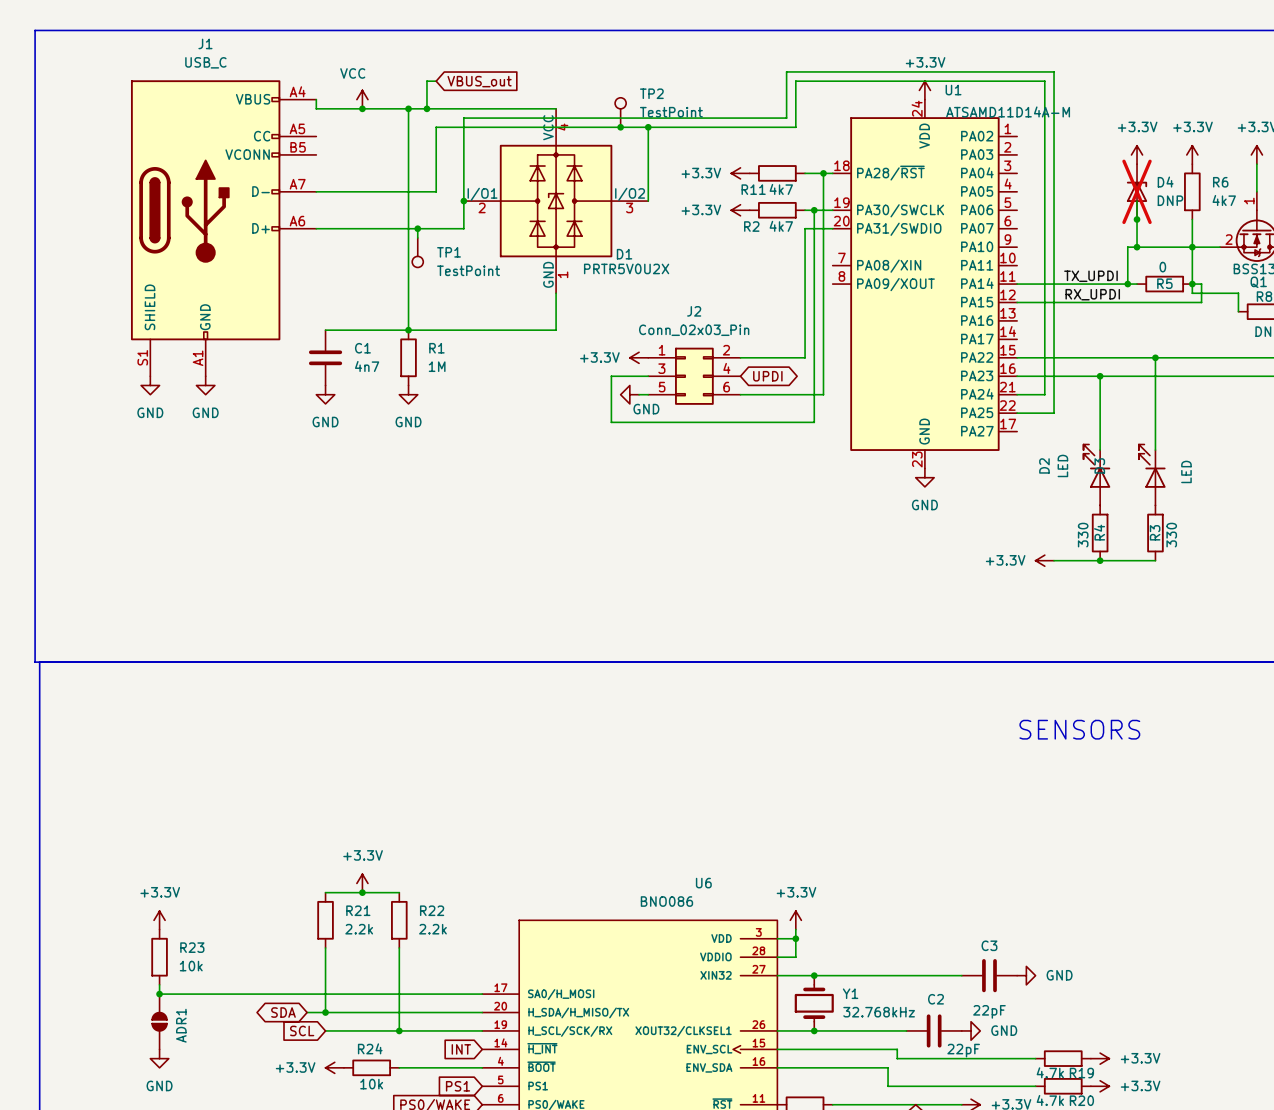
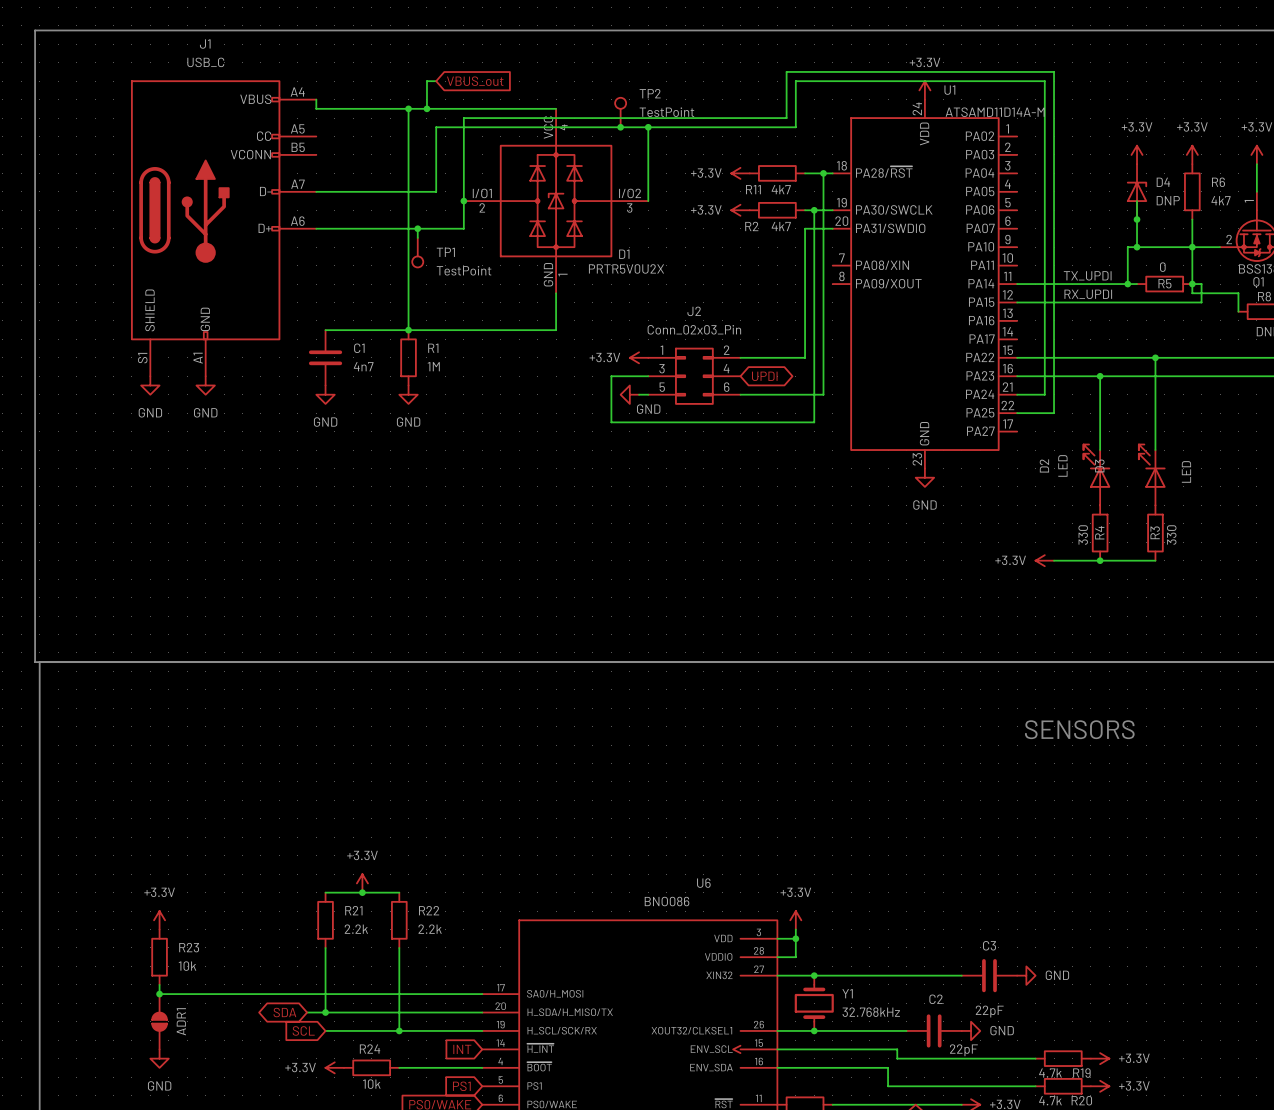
power symbol: VCC (362, 99) -> none
junction: (362, 108) -> none
D4 do-not-place cross: (1137, 191) -> none

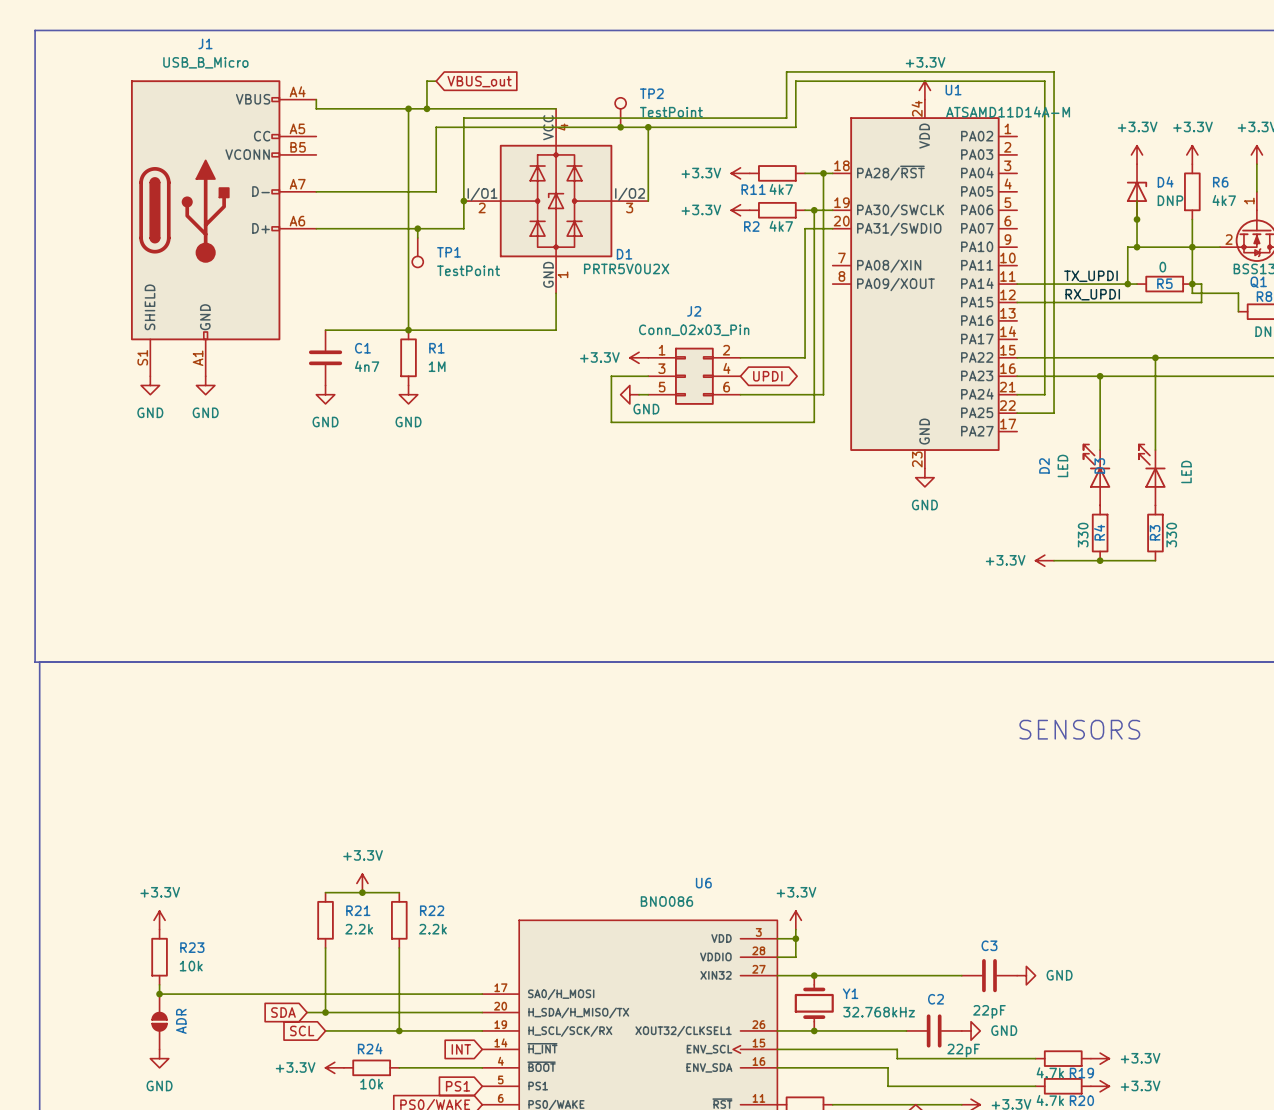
J1 value: USB_C (205, 62) -> USB_B_Micro (205, 62)
global label shape: bidirectional (284, 1012) -> input (283, 1012)
ADR1 name: ADR1 (181, 1021) -> ADR (181, 1021)

